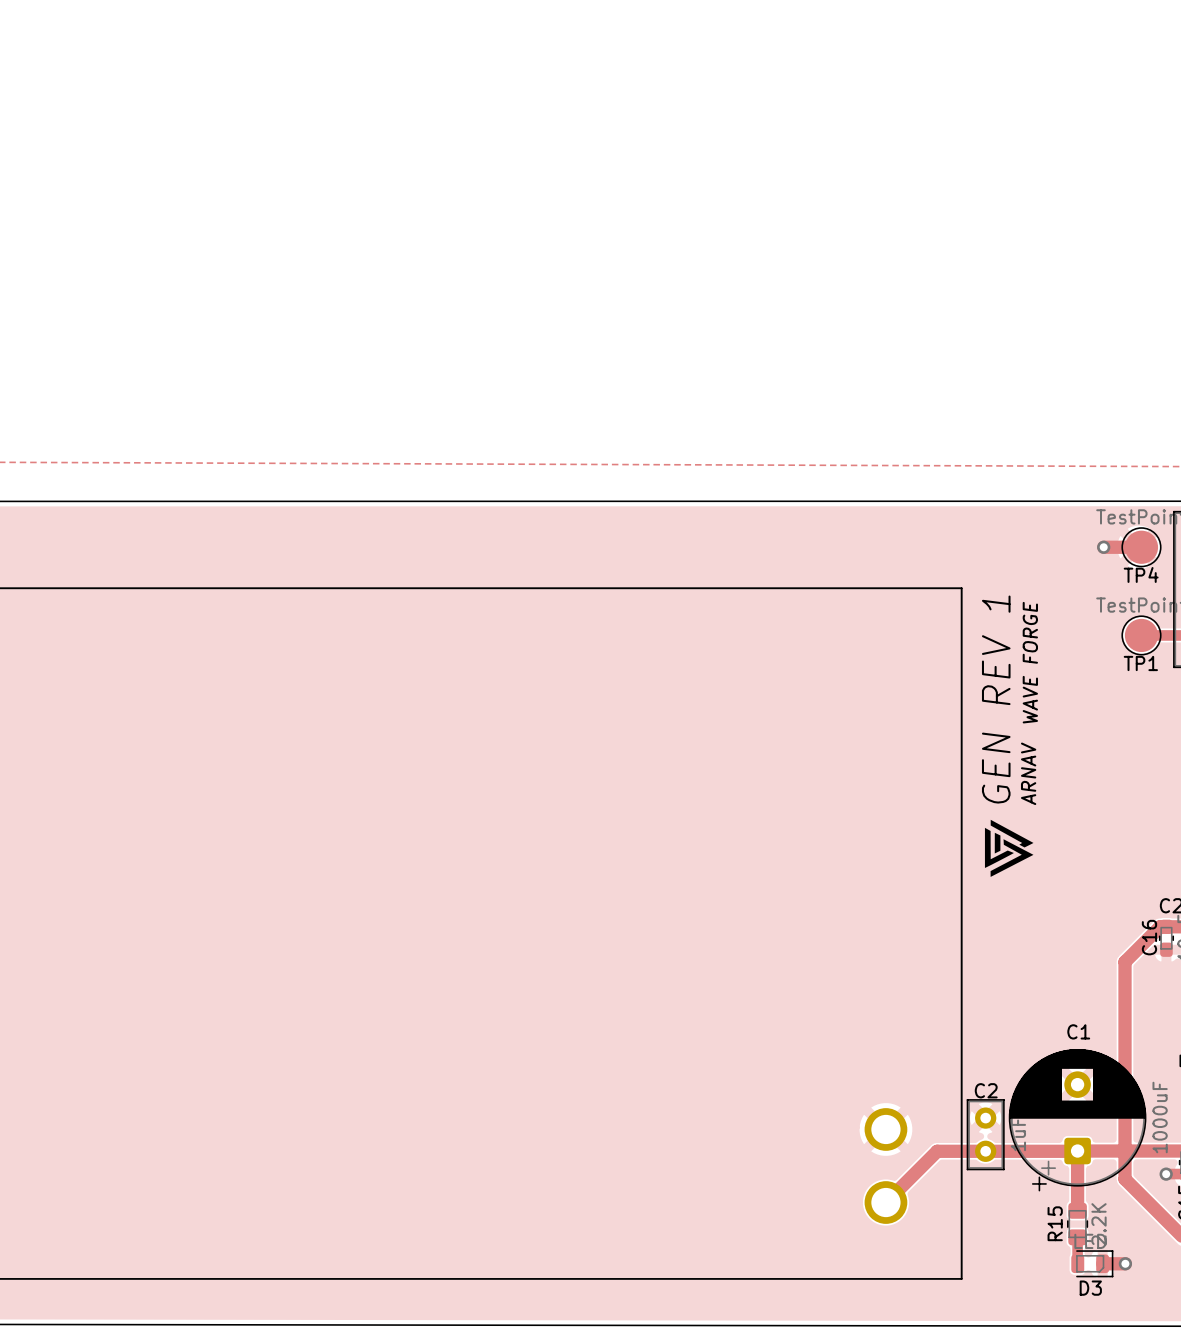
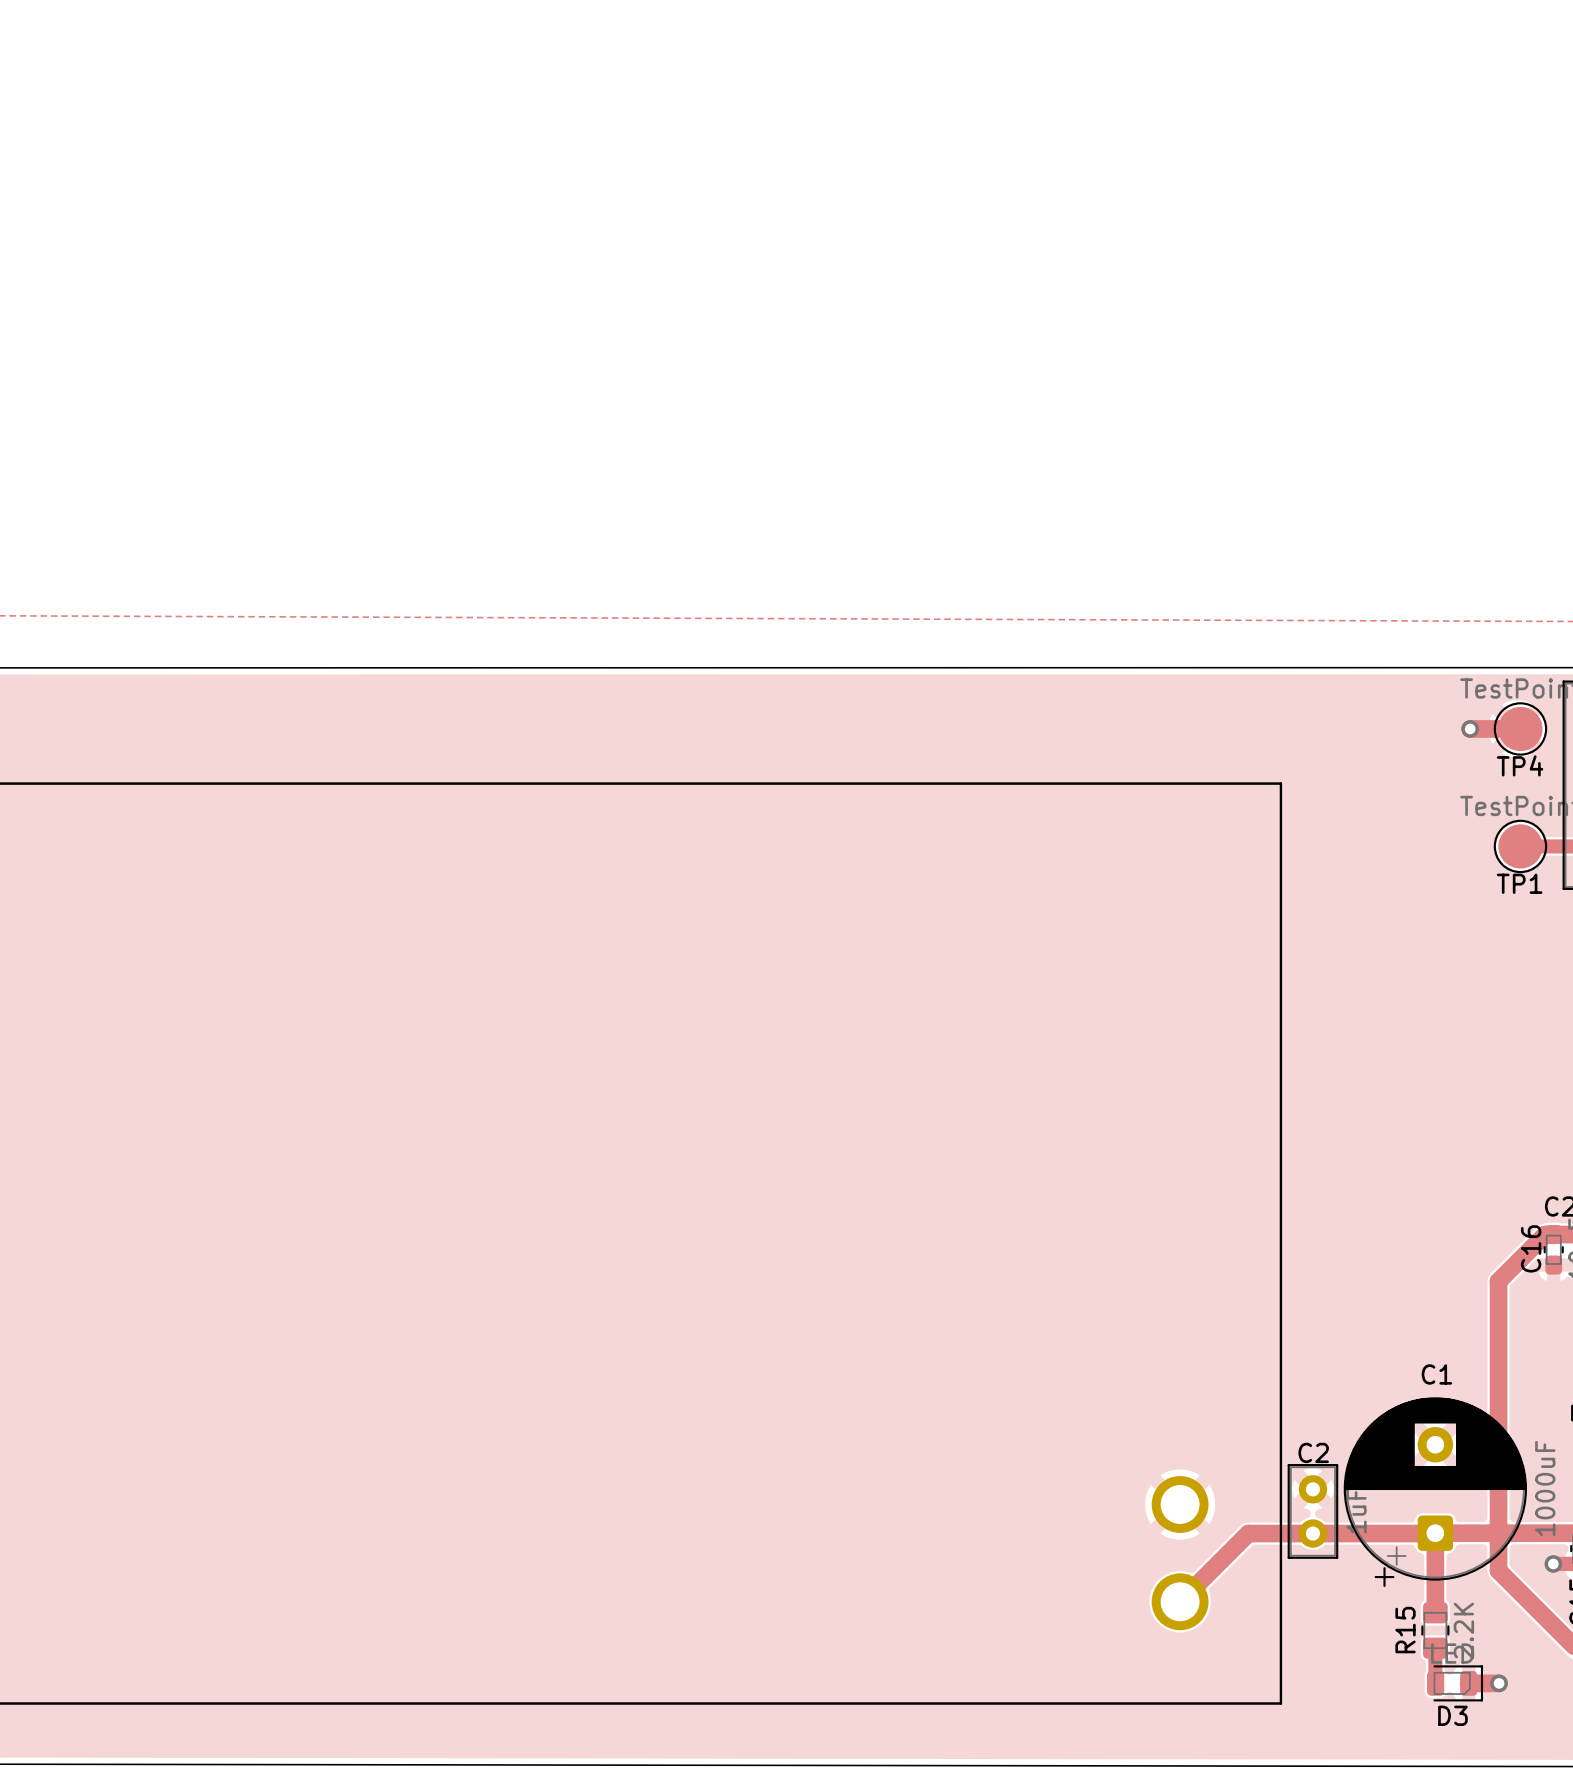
text: WAVE FORGE (1030, 662) -> none
text: GEN REV 1 (996, 699) -> none
text: ARNAV (1028, 773) -> none
drawing: [984, 819, 1034, 877] -> none

